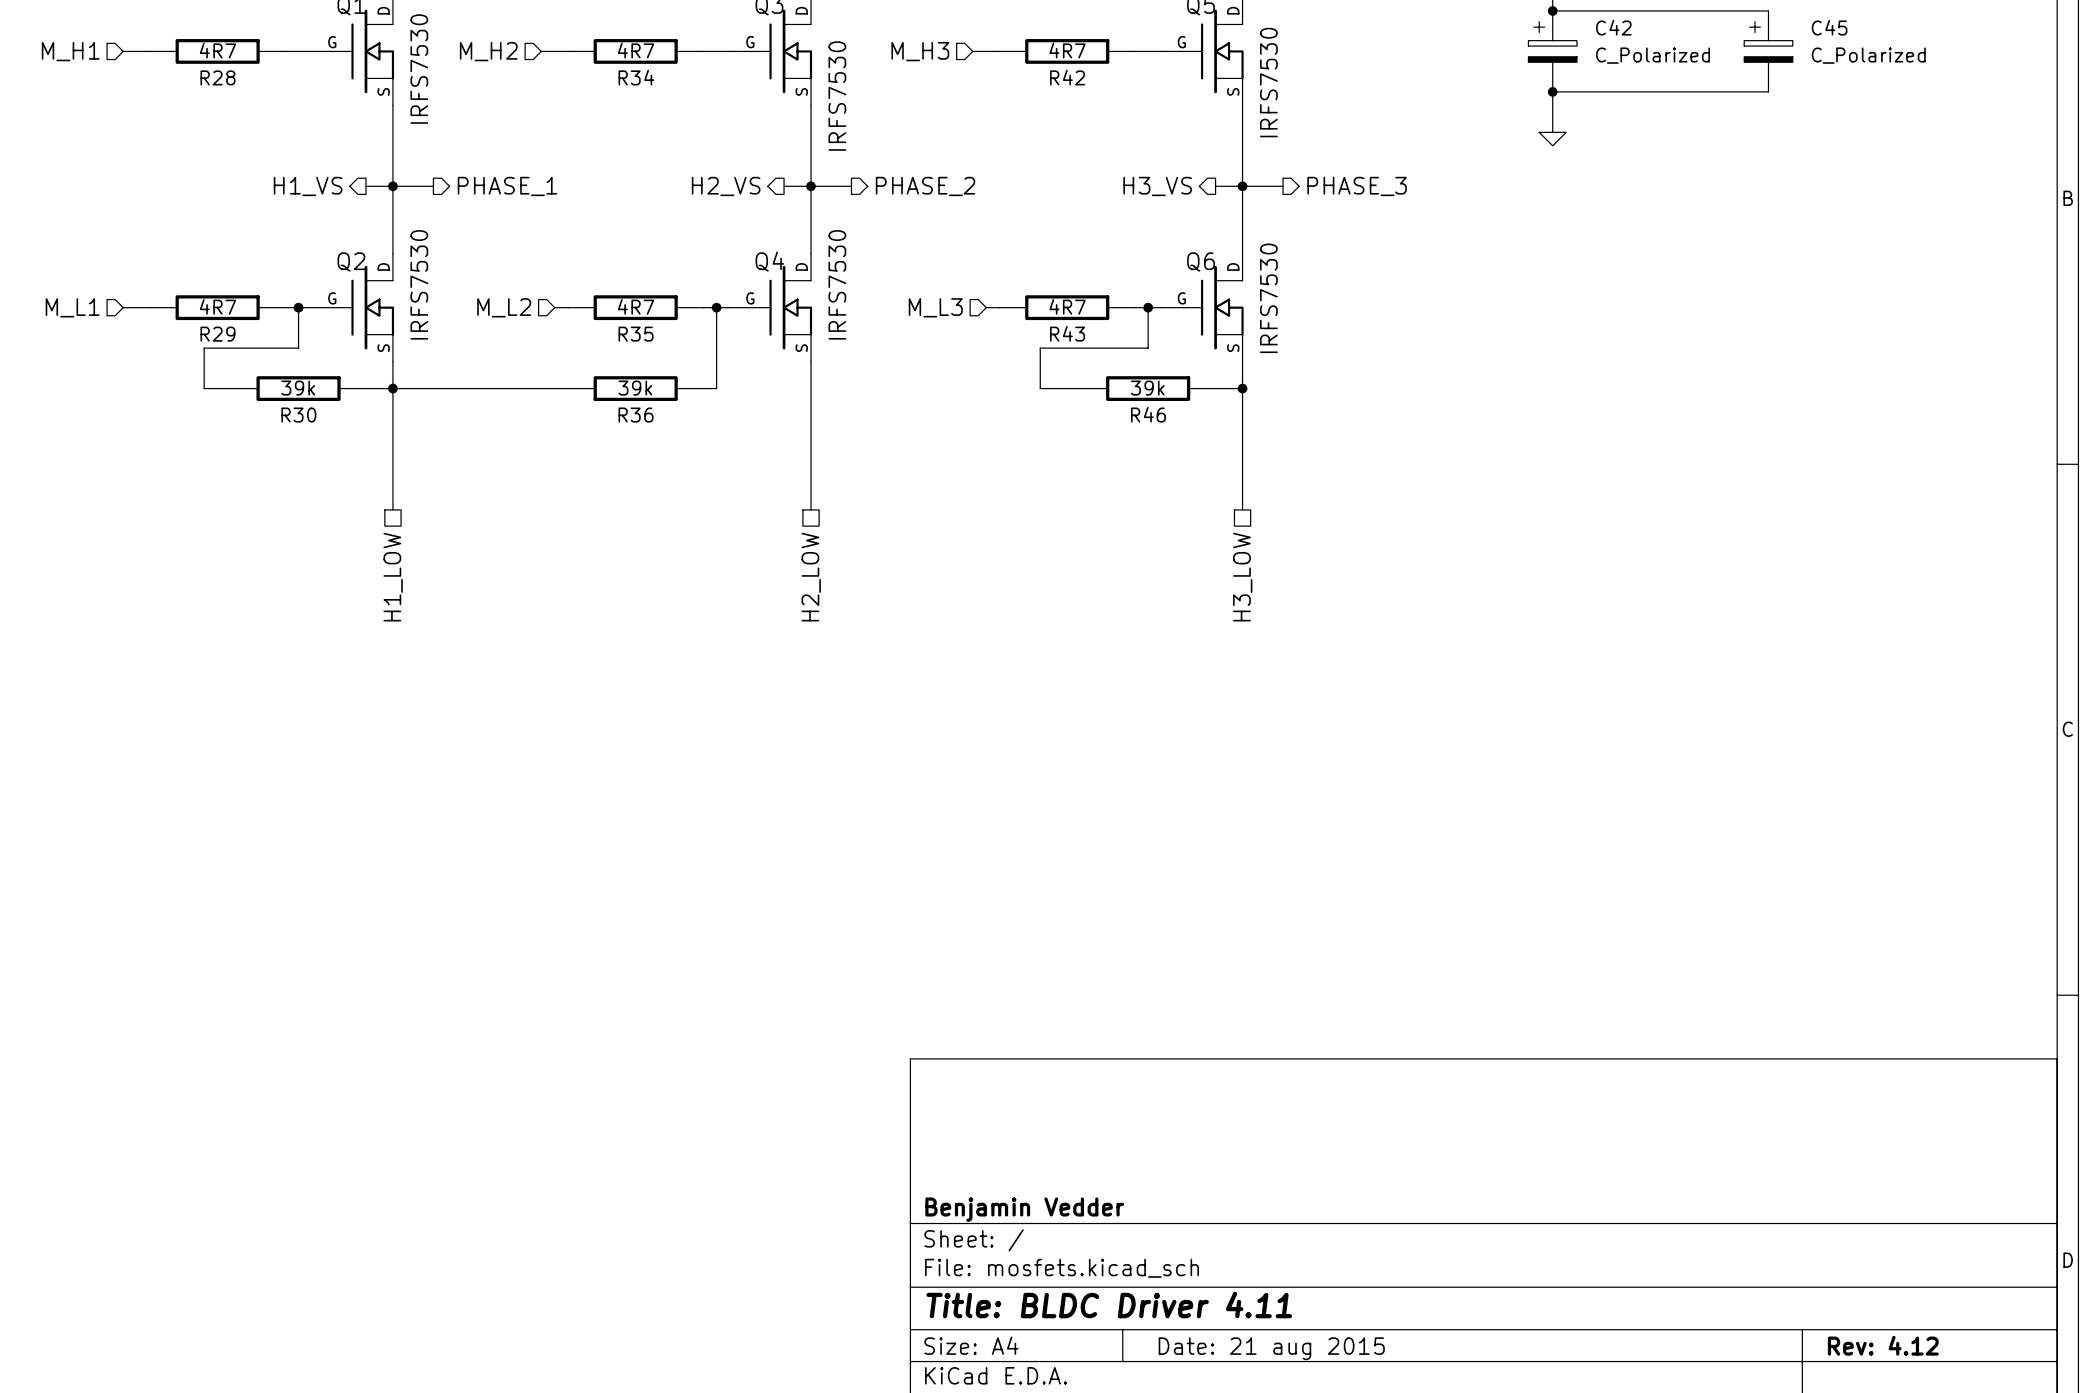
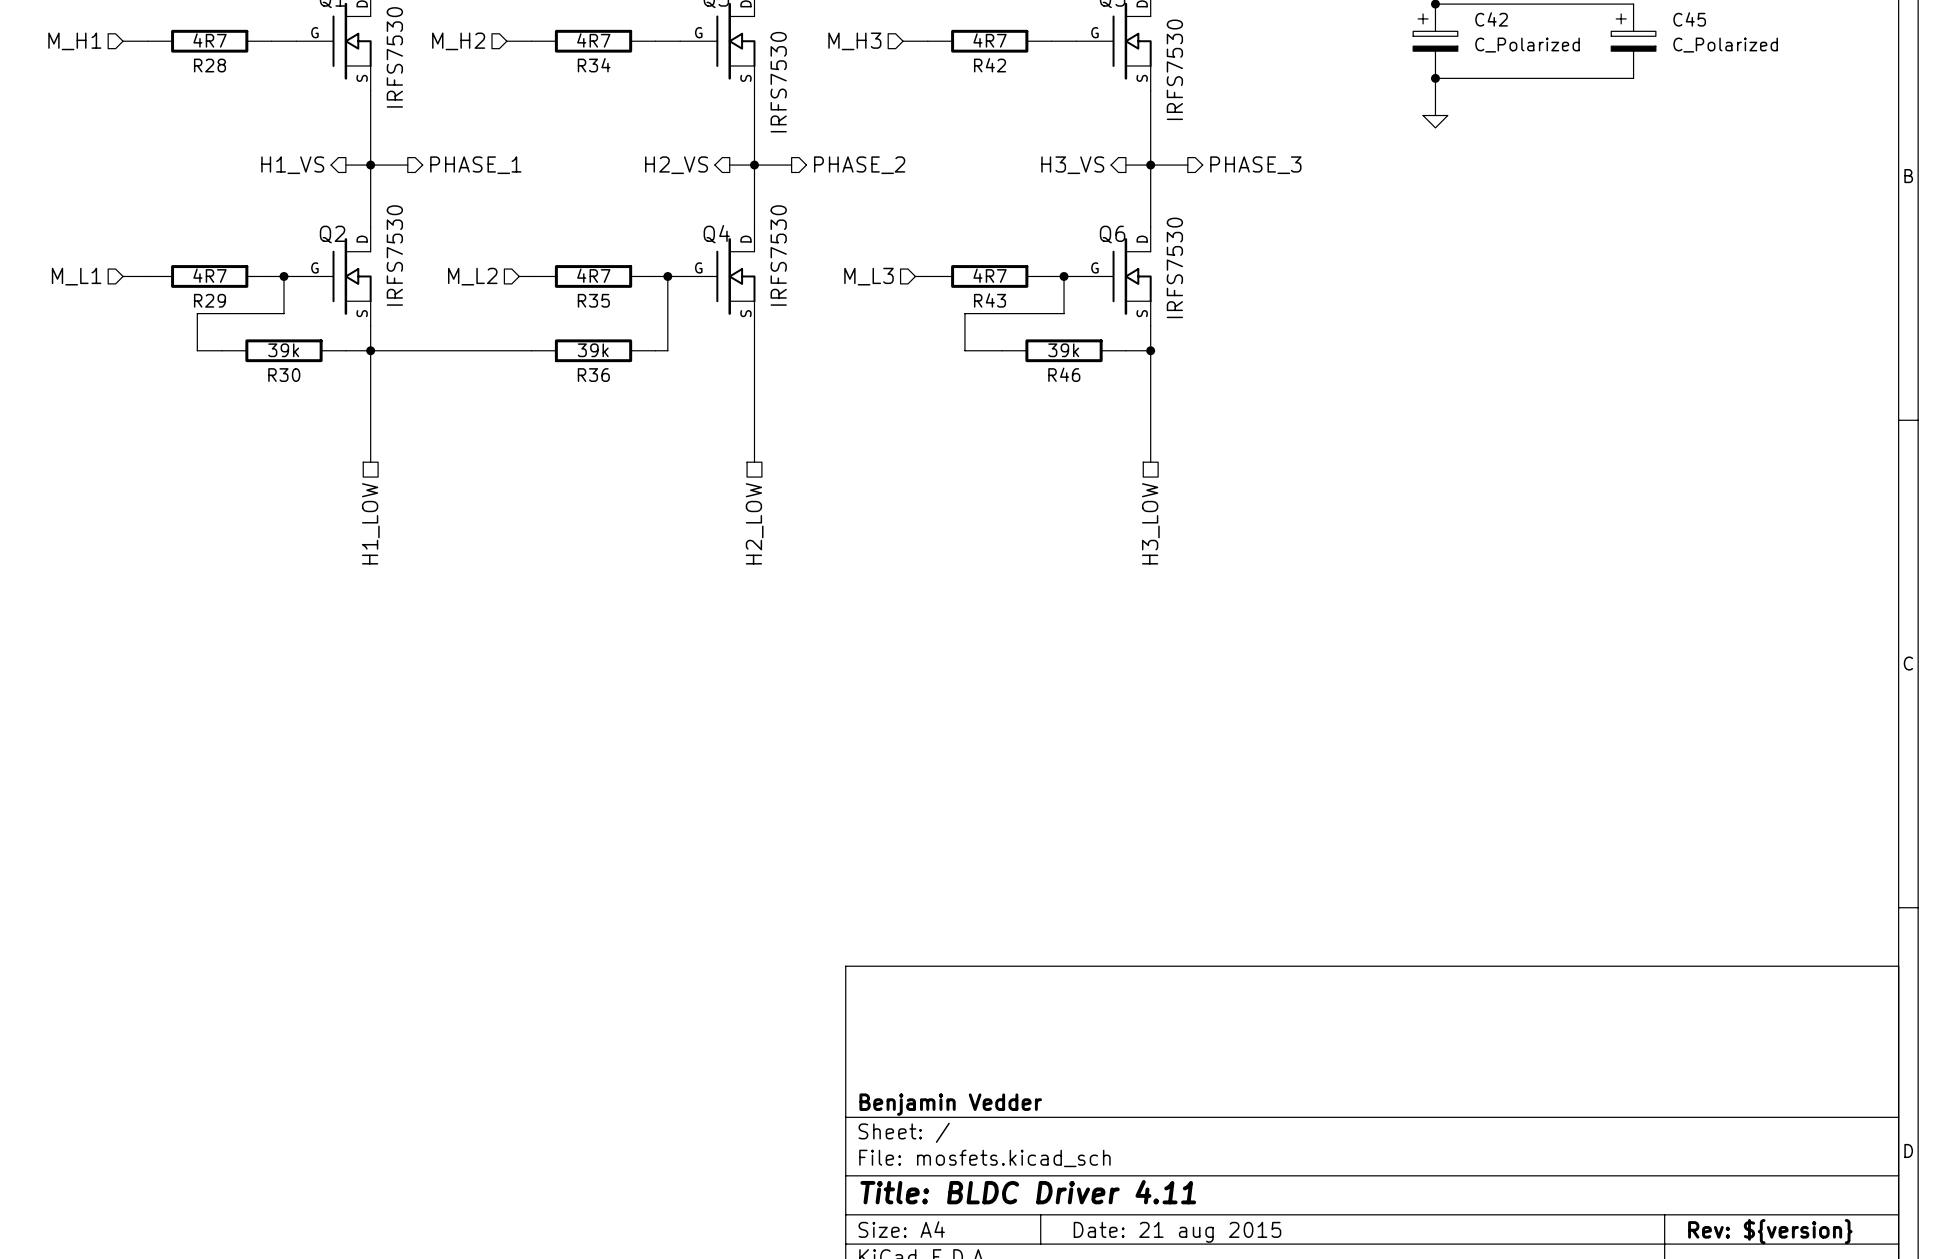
title block: Rev: 4.12 (1883, 1345) -> Rev: ${version} (1770, 1231)

